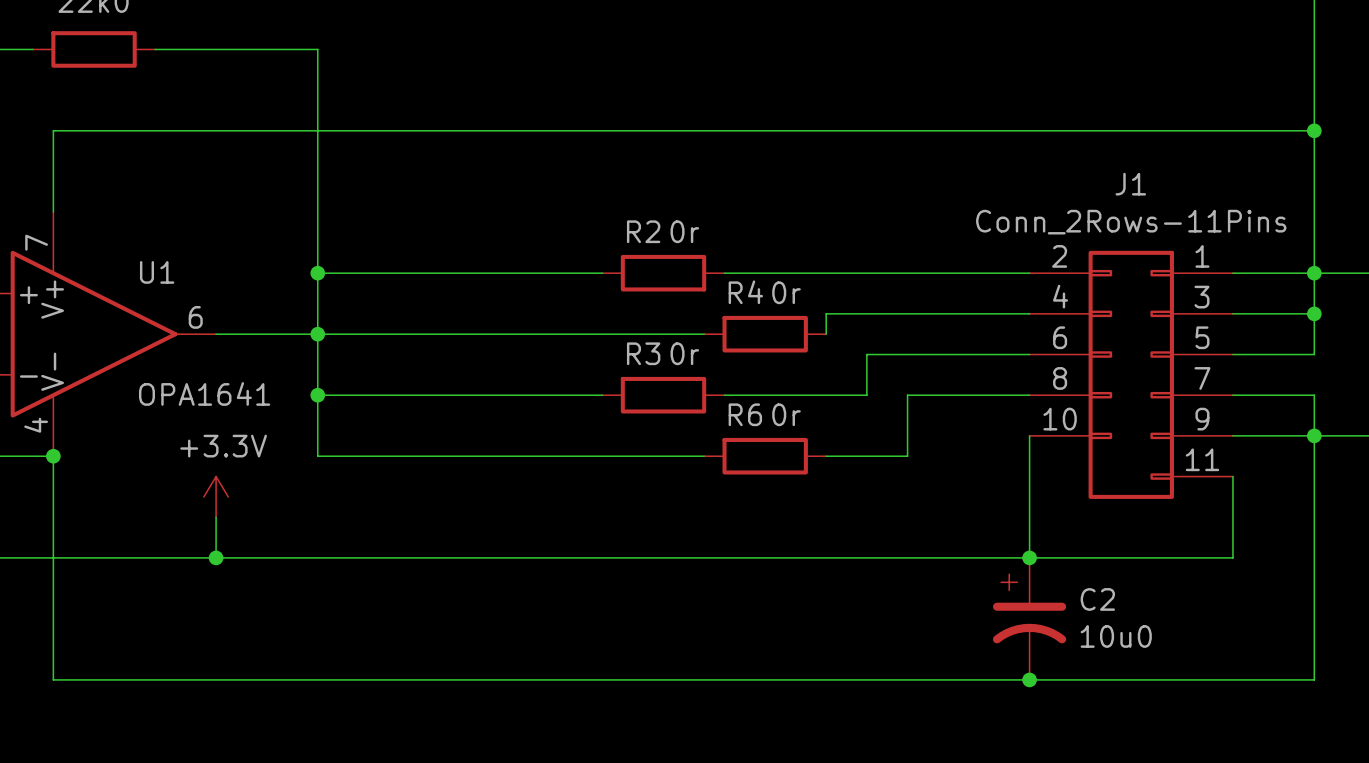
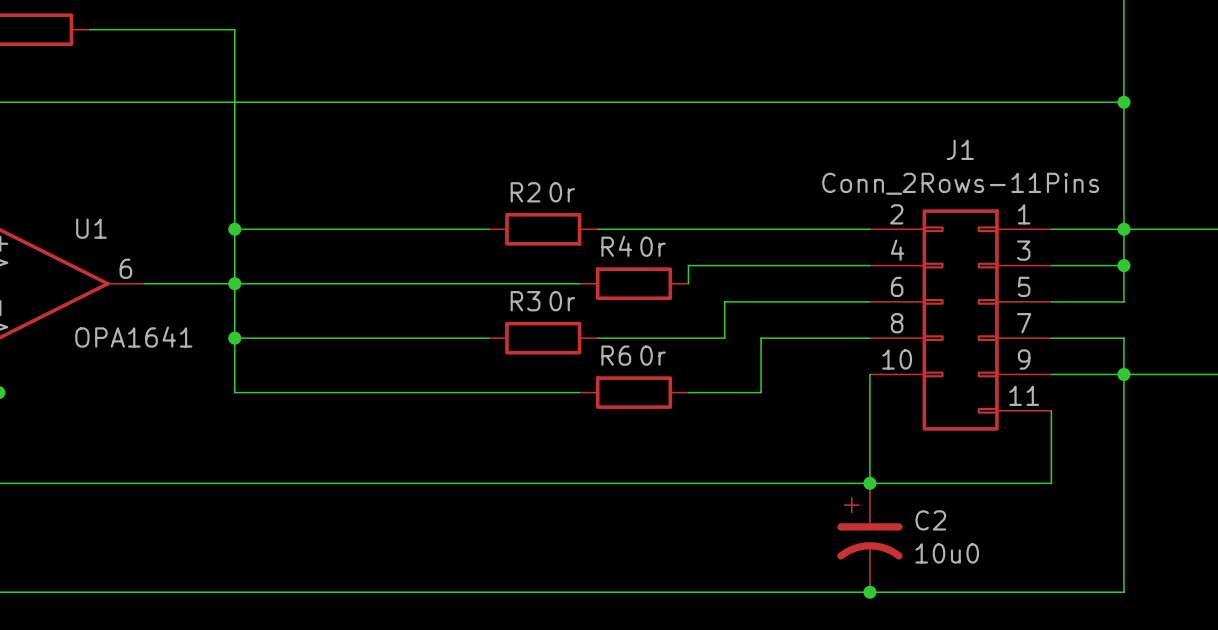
power symbol: +3.3V (216, 496) -> none
wire: (216, 517) (216, 557) -> none
junction: (216, 557) -> none

